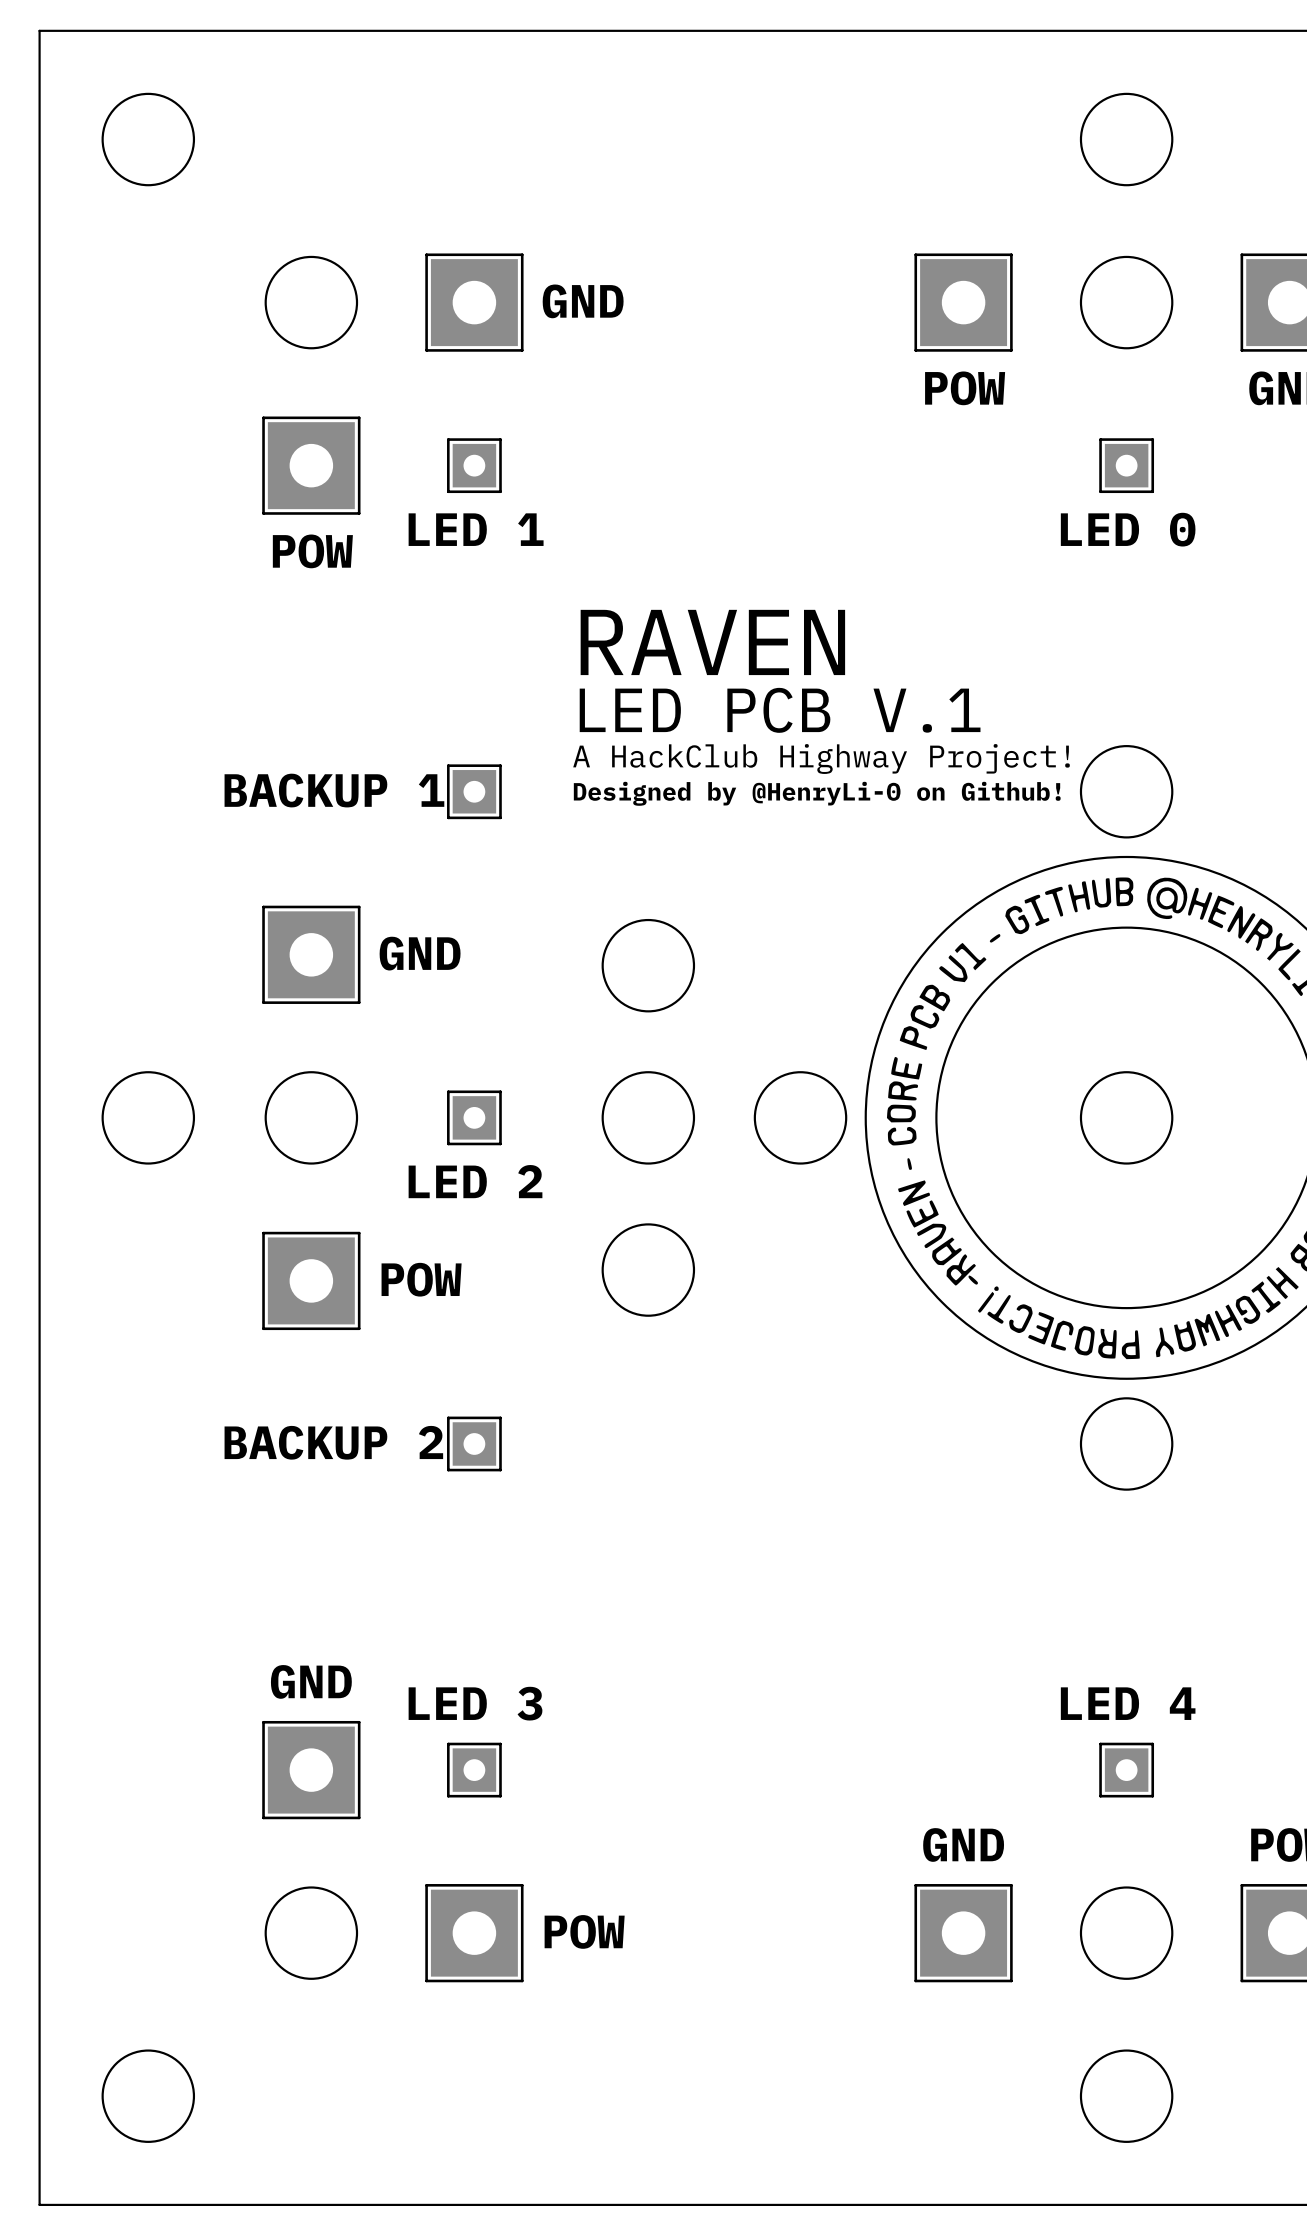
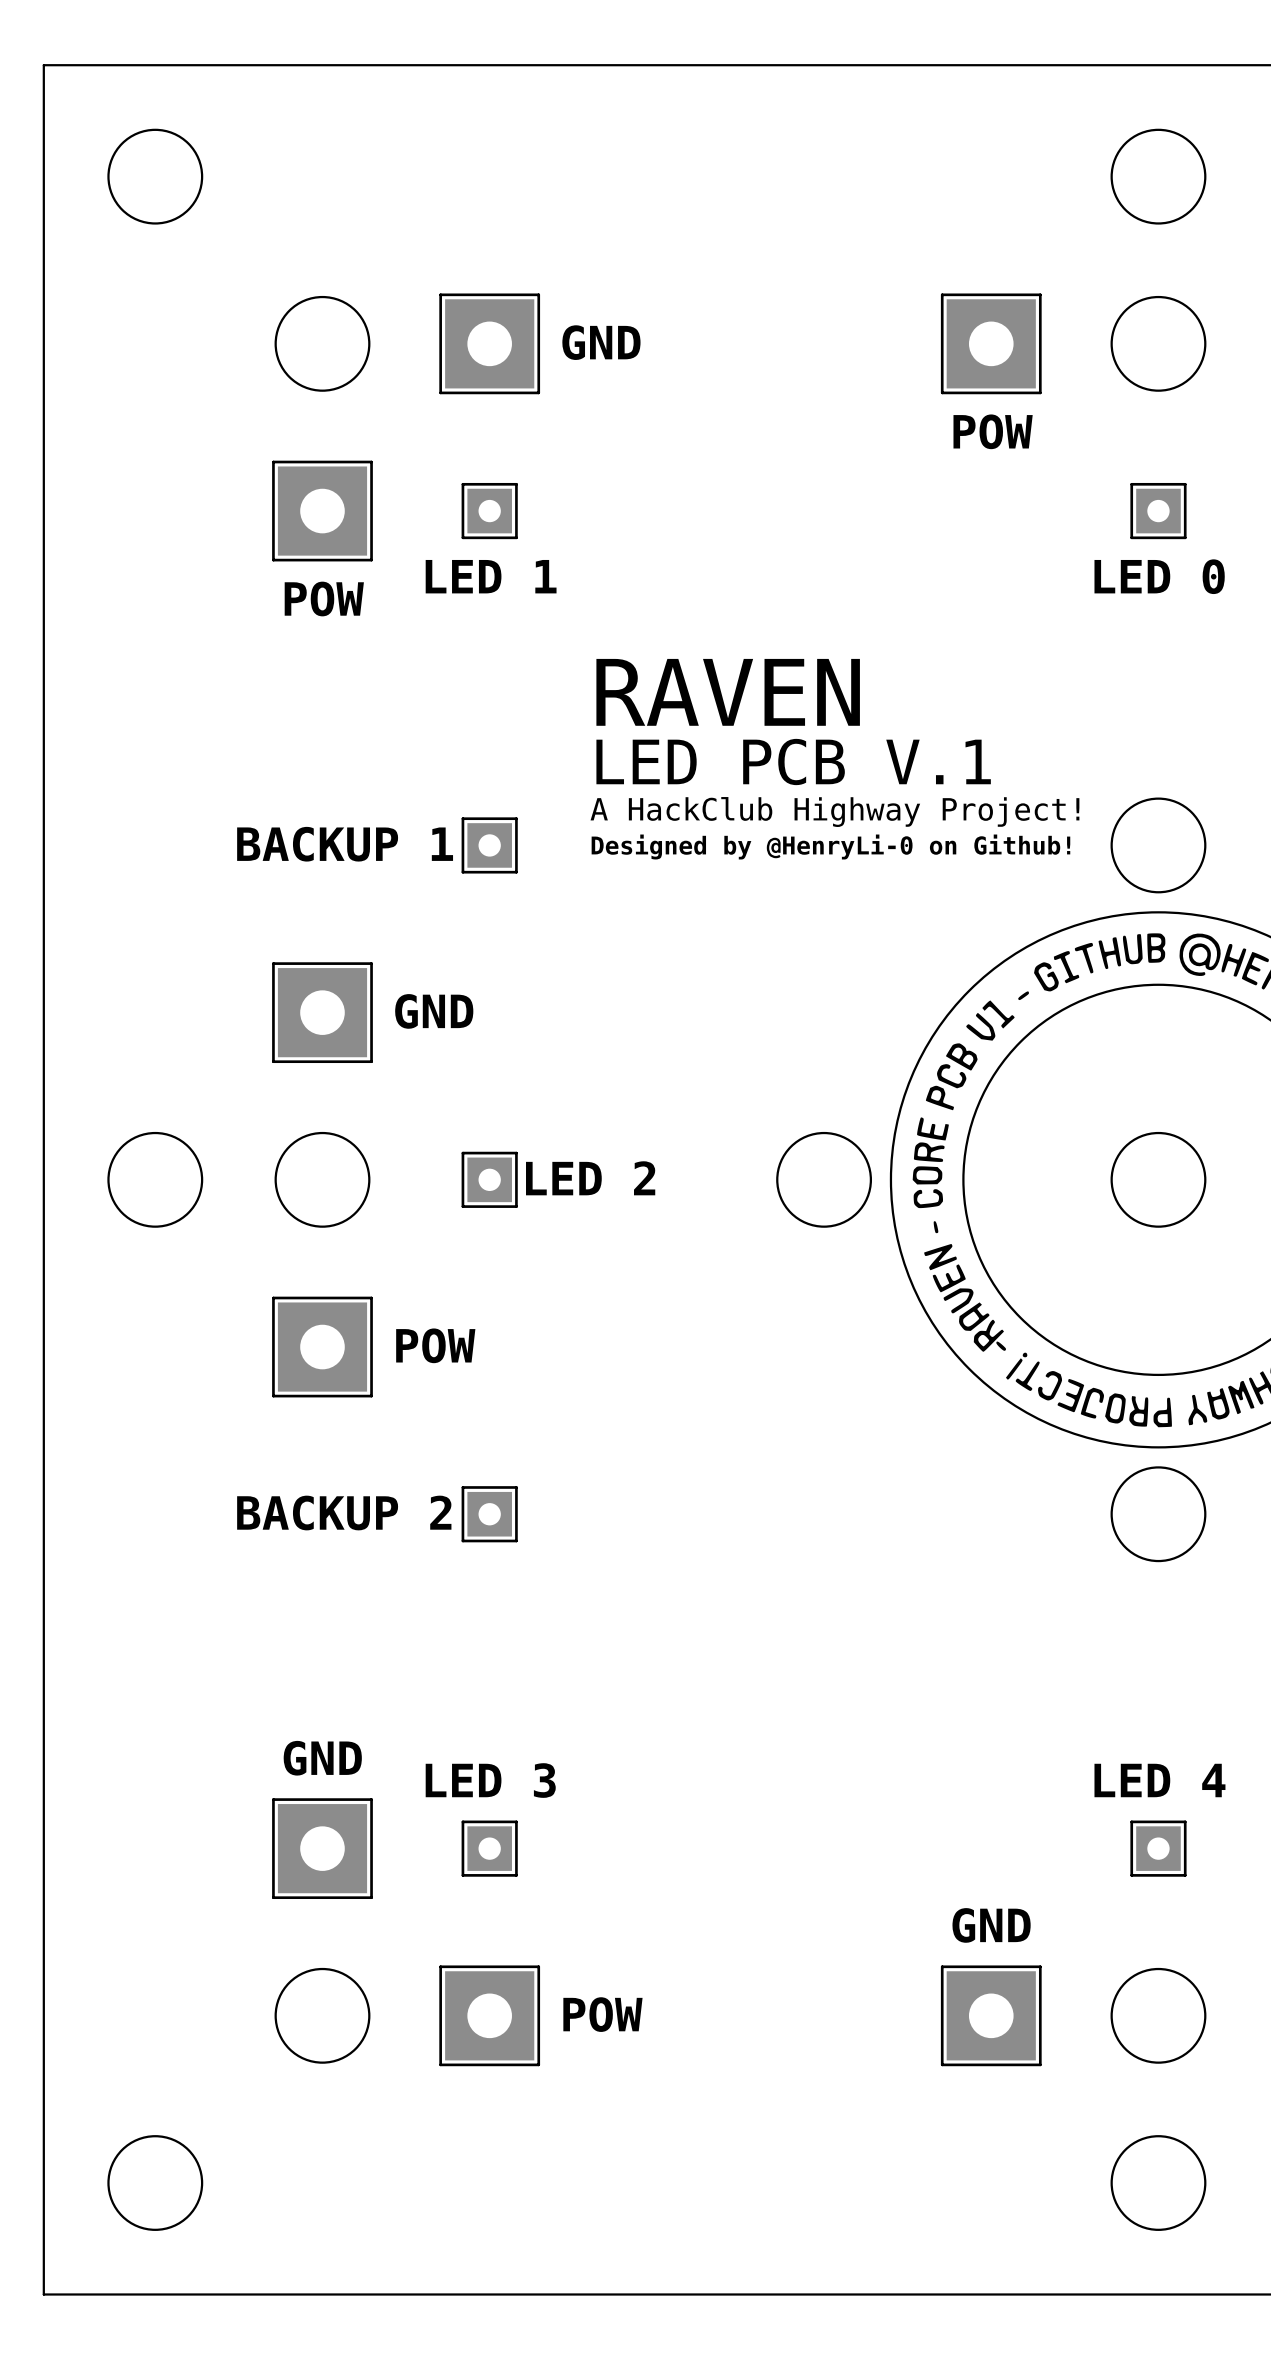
round board edge: [601, 918, 696, 1013] -> none
round board edge: [601, 1071, 696, 1165] -> none
text position: LED 2 (475, 1181) -> LED 2 (590, 1178)
round board edge: [601, 1223, 696, 1317] -> none

